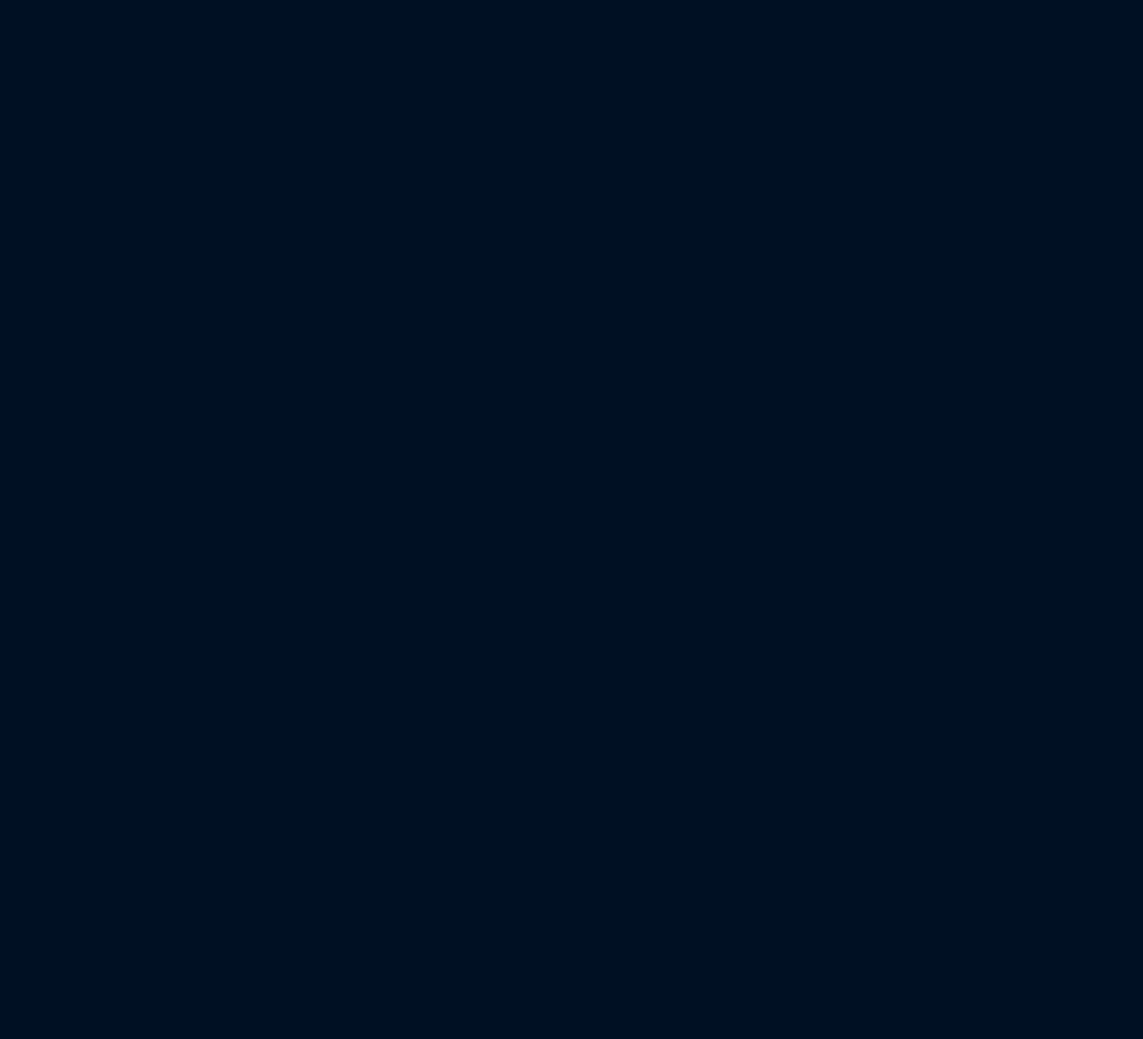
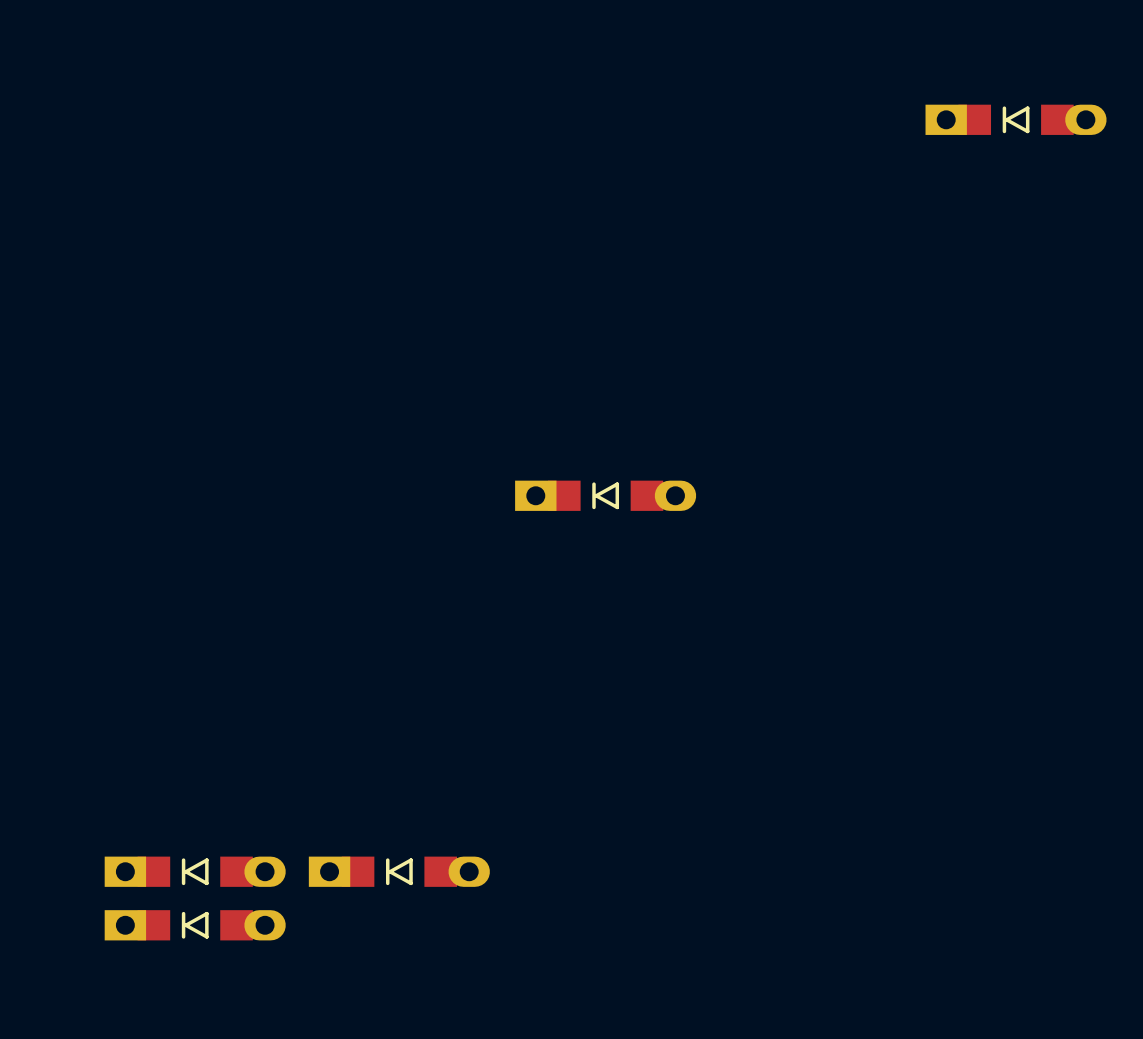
part: none -> (1016, 119)
part: none -> (605, 495)
part: none -> (195, 871)
part: none -> (399, 871)
part: none -> (195, 925)

